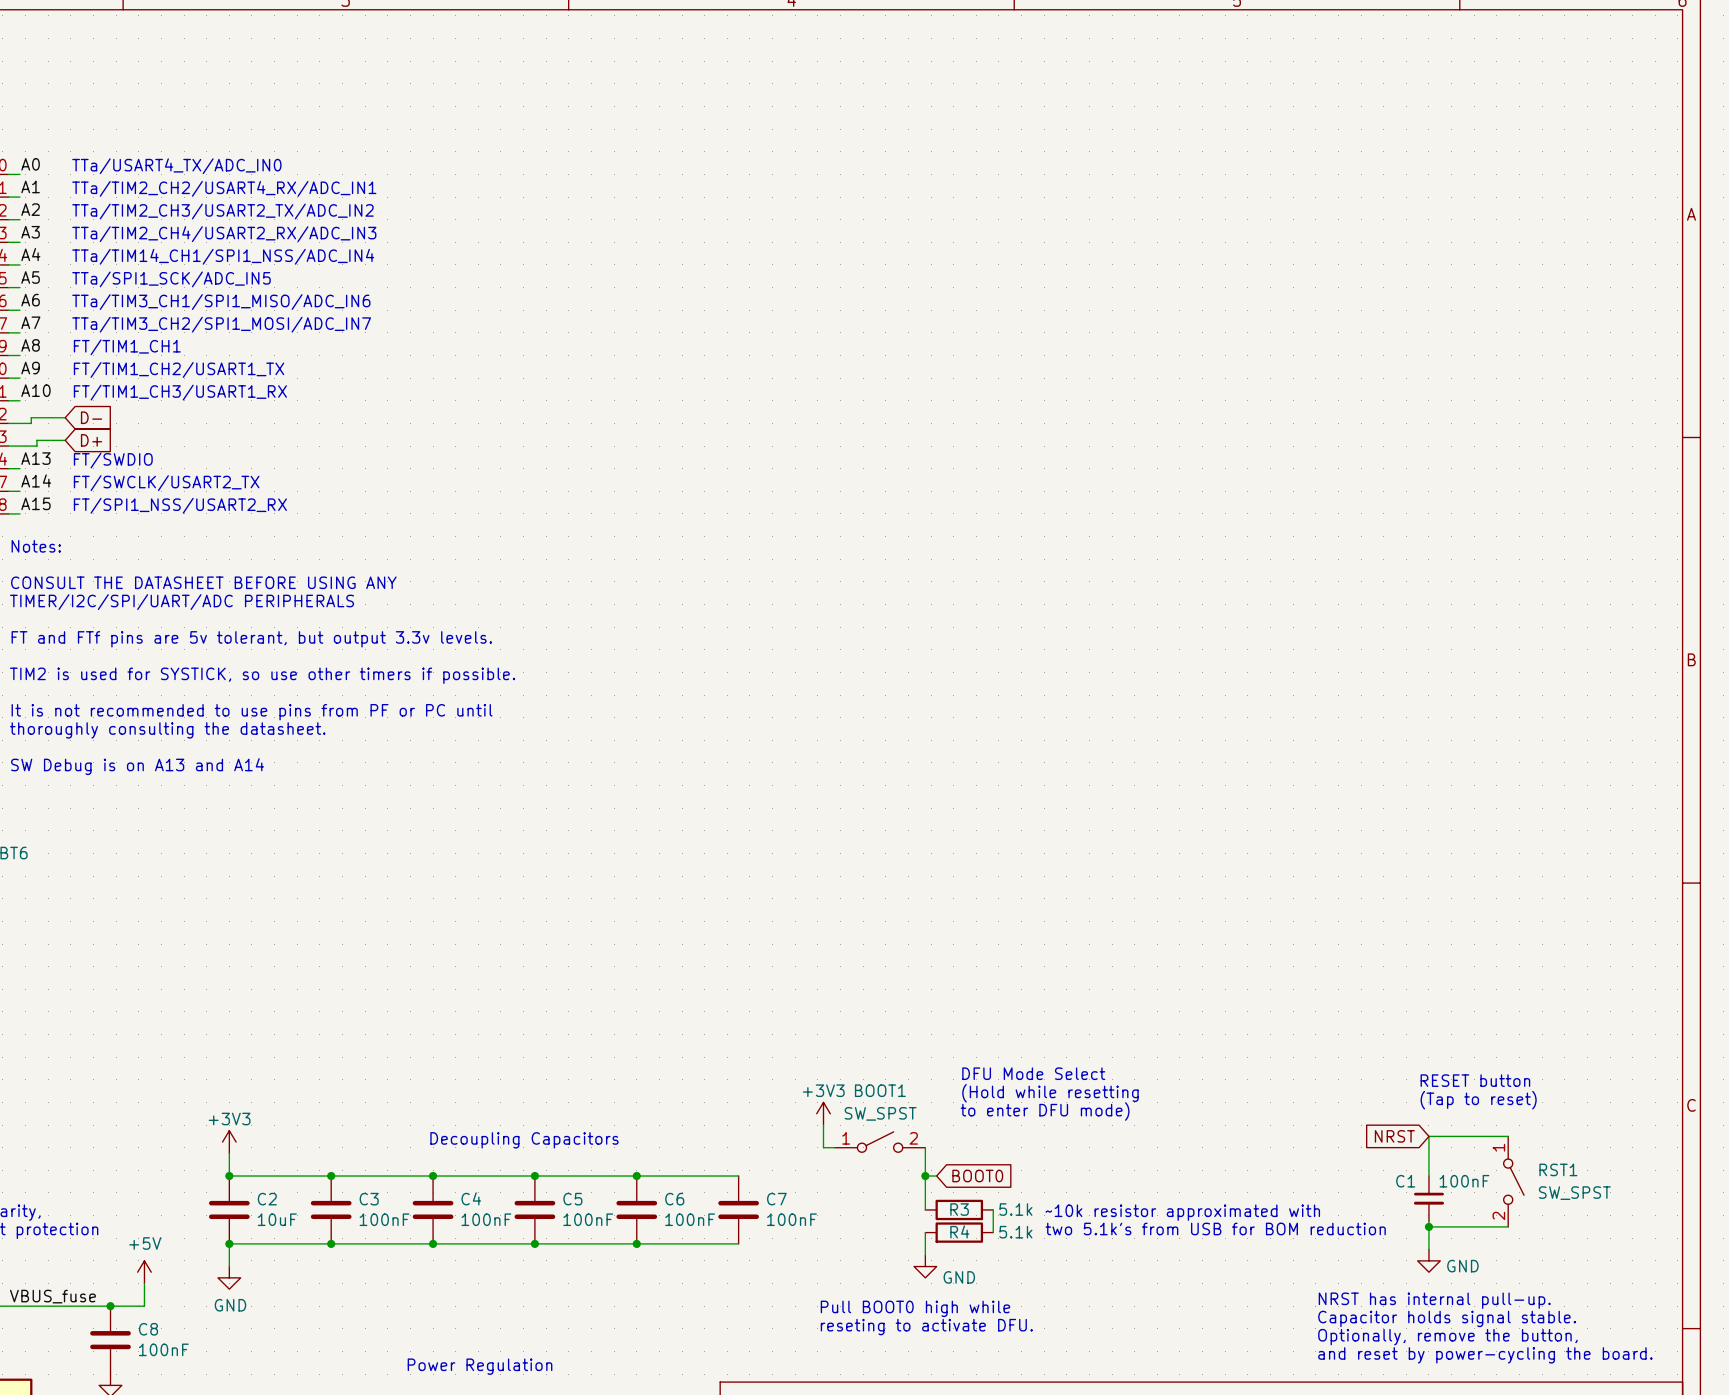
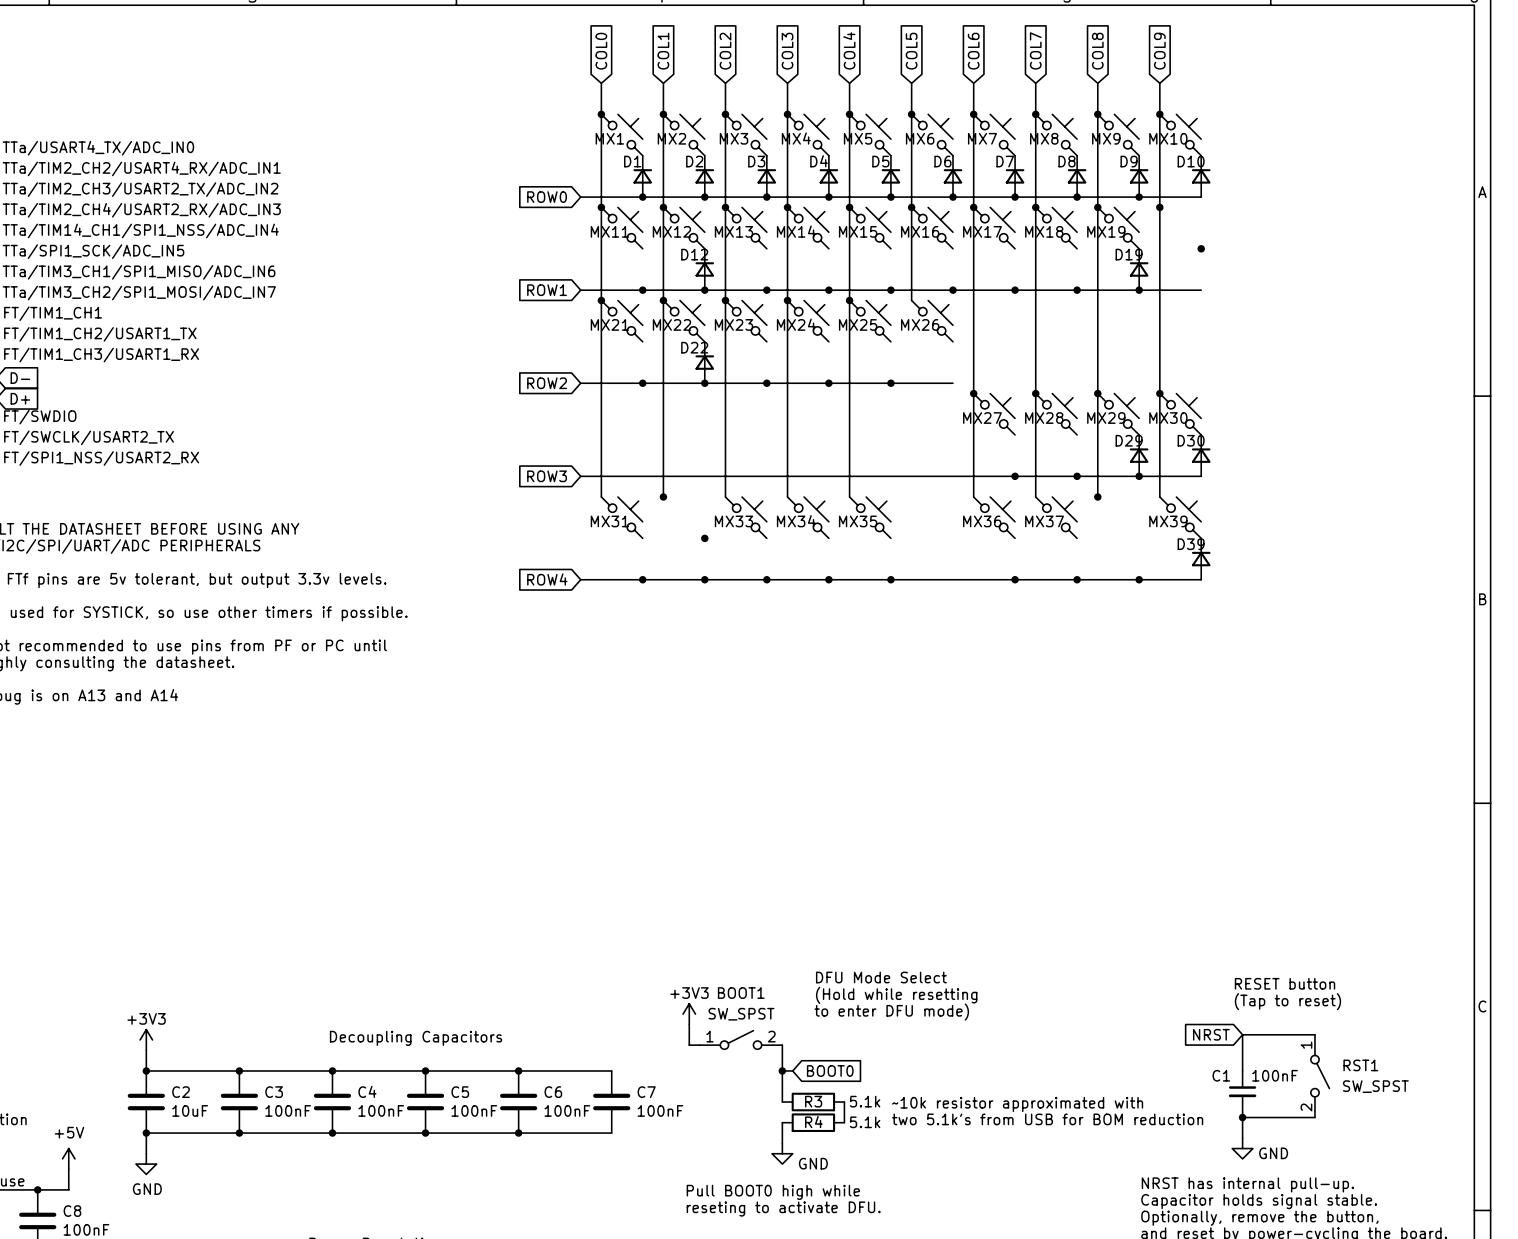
global label: none -> COL4 (849, 50)
global label: none -> COL7 (1035, 50)
global label: none -> COL0 (601, 51)
global label: none -> COL1 (663, 51)
global label: none -> COL2 (725, 51)
global label: none -> COL3 (787, 51)
global label: none -> COL5 (911, 51)
global label: none -> COL6 (973, 51)
global label: none -> COL8 (1097, 51)
global label: none -> COL9 (1159, 51)
wire: none -> (601, 83) (601, 497)
wire: none -> (663, 83) (663, 497)
wire: none -> (725, 83) (725, 497)
wire: none -> (787, 83) (787, 497)
wire: none -> (849, 83) (849, 497)
wire: none -> (911, 83) (911, 300)
wire: none -> (973, 83) (973, 497)
wire: none -> (1035, 83) (1035, 497)
wire: none -> (1097, 83) (1097, 497)
wire: none -> (1159, 83) (1159, 497)
junction: none -> (601, 114)
junction: none -> (663, 114)
junction: none -> (725, 114)
junction: none -> (787, 114)
junction: none -> (849, 114)
junction: none -> (911, 114)
junction: none -> (973, 114)
junction: none -> (1035, 114)
junction: none -> (1097, 114)
junction: none -> (1159, 114)
MX1: none -> (622, 135)
MX2: none -> (684, 135)
MX3: none -> (746, 135)
MX4: none -> (808, 135)
MX5: none -> (870, 135)
MX6: none -> (932, 135)
MX7: none -> (994, 135)
MX8: none -> (1056, 135)
MX9: none -> (1118, 135)
MX10: none -> (1180, 135)
D1: none -> (642, 176)
D2: none -> (704, 176)
D3: none -> (766, 176)
D4: none -> (828, 176)
D5: none -> (890, 176)
D6: none -> (953, 176)
D7: none -> (1015, 176)
D8: none -> (1077, 176)
D9: none -> (1139, 176)
D10: none -> (1201, 176)
global label: none -> ROW0 (547, 197)
wire: none -> (580, 197) (1201, 197)
junction: none -> (642, 197)
junction: none -> (704, 197)
junction: none -> (766, 197)
junction: none -> (828, 197)
junction: none -> (890, 197)
junction: none -> (953, 197)
junction: none -> (1015, 197)
junction: none -> (1077, 197)
junction: none -> (1139, 197)
junction: none -> (601, 207)
junction: none -> (663, 207)
junction: none -> (725, 207)
junction: none -> (787, 207)
junction: none -> (849, 207)
junction: none -> (911, 207)
junction: none -> (973, 207)
junction: none -> (1035, 207)
junction: none -> (1097, 207)
junction: none -> (1159, 207)
MX11: none -> (622, 228)
MX12: none -> (684, 228)
MX13: none -> (746, 228)
MX14: none -> (808, 228)
MX15: none -> (870, 228)
MX16: none -> (932, 228)
MX17: none -> (994, 228)
MX18: none -> (1056, 228)
MX19: none -> (1118, 228)
junction: none -> (1201, 248)
D12: none -> (704, 269)
D19: none -> (1139, 269)
global label: none -> ROW1 (547, 290)
wire: none -> (580, 290) (1201, 290)
junction: none -> (642, 290)
junction: none -> (704, 290)
junction: none -> (766, 290)
junction: none -> (828, 290)
junction: none -> (890, 290)
junction: none -> (953, 290)
junction: none -> (1015, 290)
junction: none -> (1077, 290)
junction: none -> (1139, 290)
junction: none -> (601, 300)
junction: none -> (663, 300)
junction: none -> (725, 300)
junction: none -> (787, 300)
junction: none -> (849, 300)
MX21: none -> (622, 321)
MX22: none -> (684, 321)
MX23: none -> (746, 321)
MX24: none -> (808, 321)
MX25: none -> (870, 321)
MX26: none -> (932, 321)
D22: none -> (704, 362)
global label: none -> ROW2 (547, 383)
wire: none -> (580, 383) (953, 383)
junction: none -> (642, 383)
junction: none -> (704, 383)
junction: none -> (766, 383)
junction: none -> (828, 383)
junction: none -> (890, 383)
junction: none -> (973, 393)
junction: none -> (1035, 393)
junction: none -> (1097, 393)
junction: none -> (1159, 393)
MX27: none -> (994, 414)
MX28: none -> (1056, 414)
MX29: none -> (1118, 414)
MX30: none -> (1180, 414)
D29: none -> (1139, 455)
D30: none -> (1201, 455)
global label: none -> ROW3 (547, 476)
wire: none -> (580, 476) (1201, 476)
junction: none -> (1015, 476)
junction: none -> (1077, 476)
junction: none -> (1139, 476)
junction: none -> (663, 497)
junction: none -> (1097, 497)
MX31: none -> (622, 517)
MX33: none -> (746, 517)
MX34: none -> (808, 517)
MX35: none -> (870, 517)
MX36: none -> (994, 517)
MX37: none -> (1056, 517)
MX39: none -> (1180, 517)
junction: none -> (704, 538)
D39: none -> (1201, 559)
global label: none -> ROW4 (547, 579)
wire: none -> (580, 579) (1201, 579)
junction: none -> (642, 579)
junction: none -> (704, 579)
junction: none -> (766, 579)
junction: none -> (828, 579)
junction: none -> (890, 579)
junction: none -> (1015, 579)
junction: none -> (1077, 579)
junction: none -> (1139, 579)

